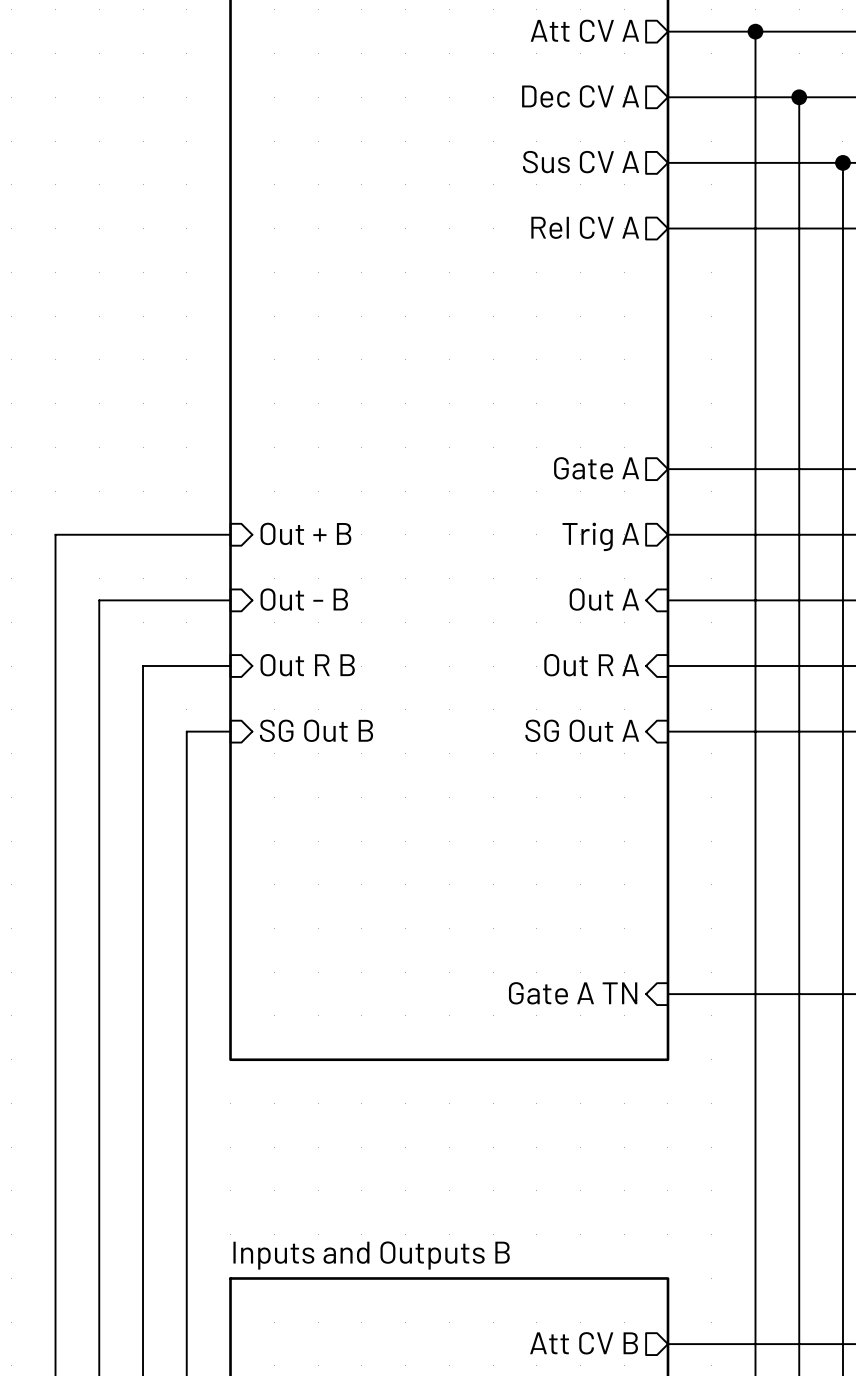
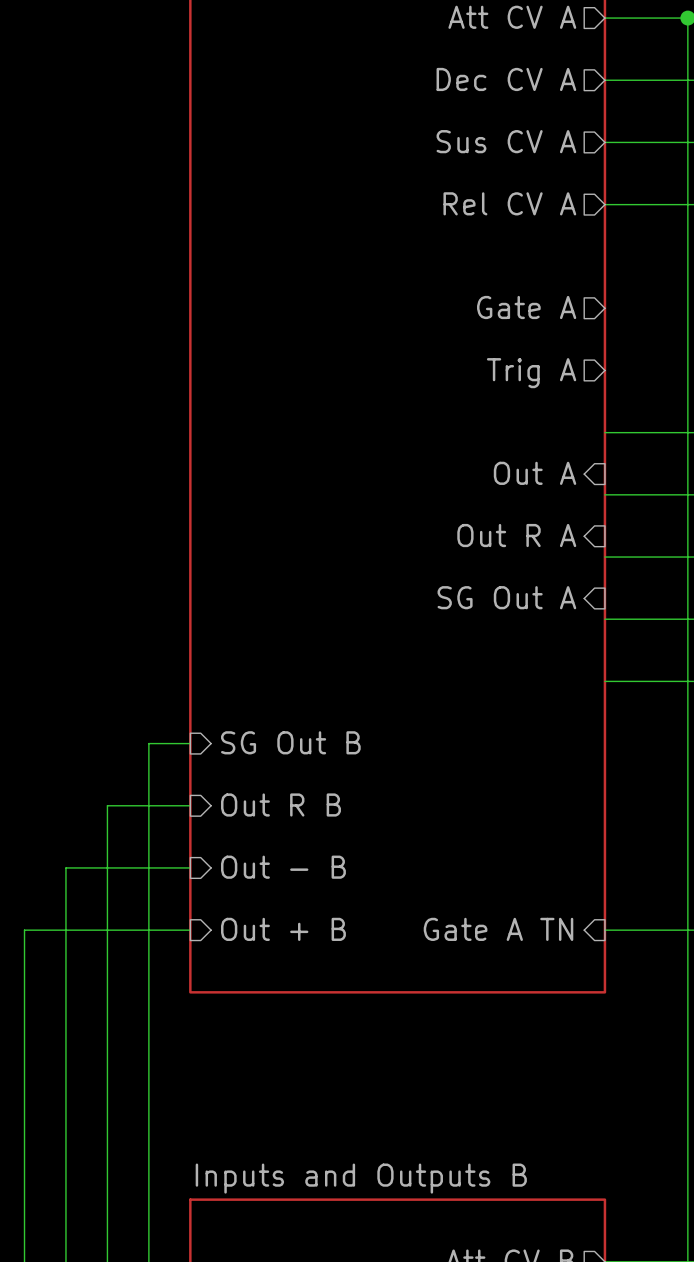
sheet pin position: Gate A (596, 468) -> Gate A (526, 307)
sheet pin: Out + B (305, 533) -> none
wire: (230, 534) (55, 534) (55, 994) -> (190, 930) (24, 930)
sheet pin position: Trig A (600, 536) -> Trig A (531, 373)
sheet pin position: Out - B (304, 599) -> Out - B (283, 867)
sheet pin position: Out A (604, 599) -> Out A (535, 473)
wire: (230, 600) (99, 600) (99, 928) -> (190, 867) (65, 867)
sheet pin position: Out R B (307, 665) -> Out R B (280, 805)
sheet pin position: Out R A (591, 665) -> Out R A (516, 535)
wire: (230, 666) (143, 666) (143, 862) -> (190, 805) (107, 805)
sheet pin position: SG Out B (316, 730) -> SG Out B (290, 742)
sheet pin position: SG Out A (582, 730) -> SG Out A (506, 597)
wire: (230, 731) (186, 731) (186, 797) -> (190, 743) (148, 743)
sheet pin: none -> Out + B (283, 929)

